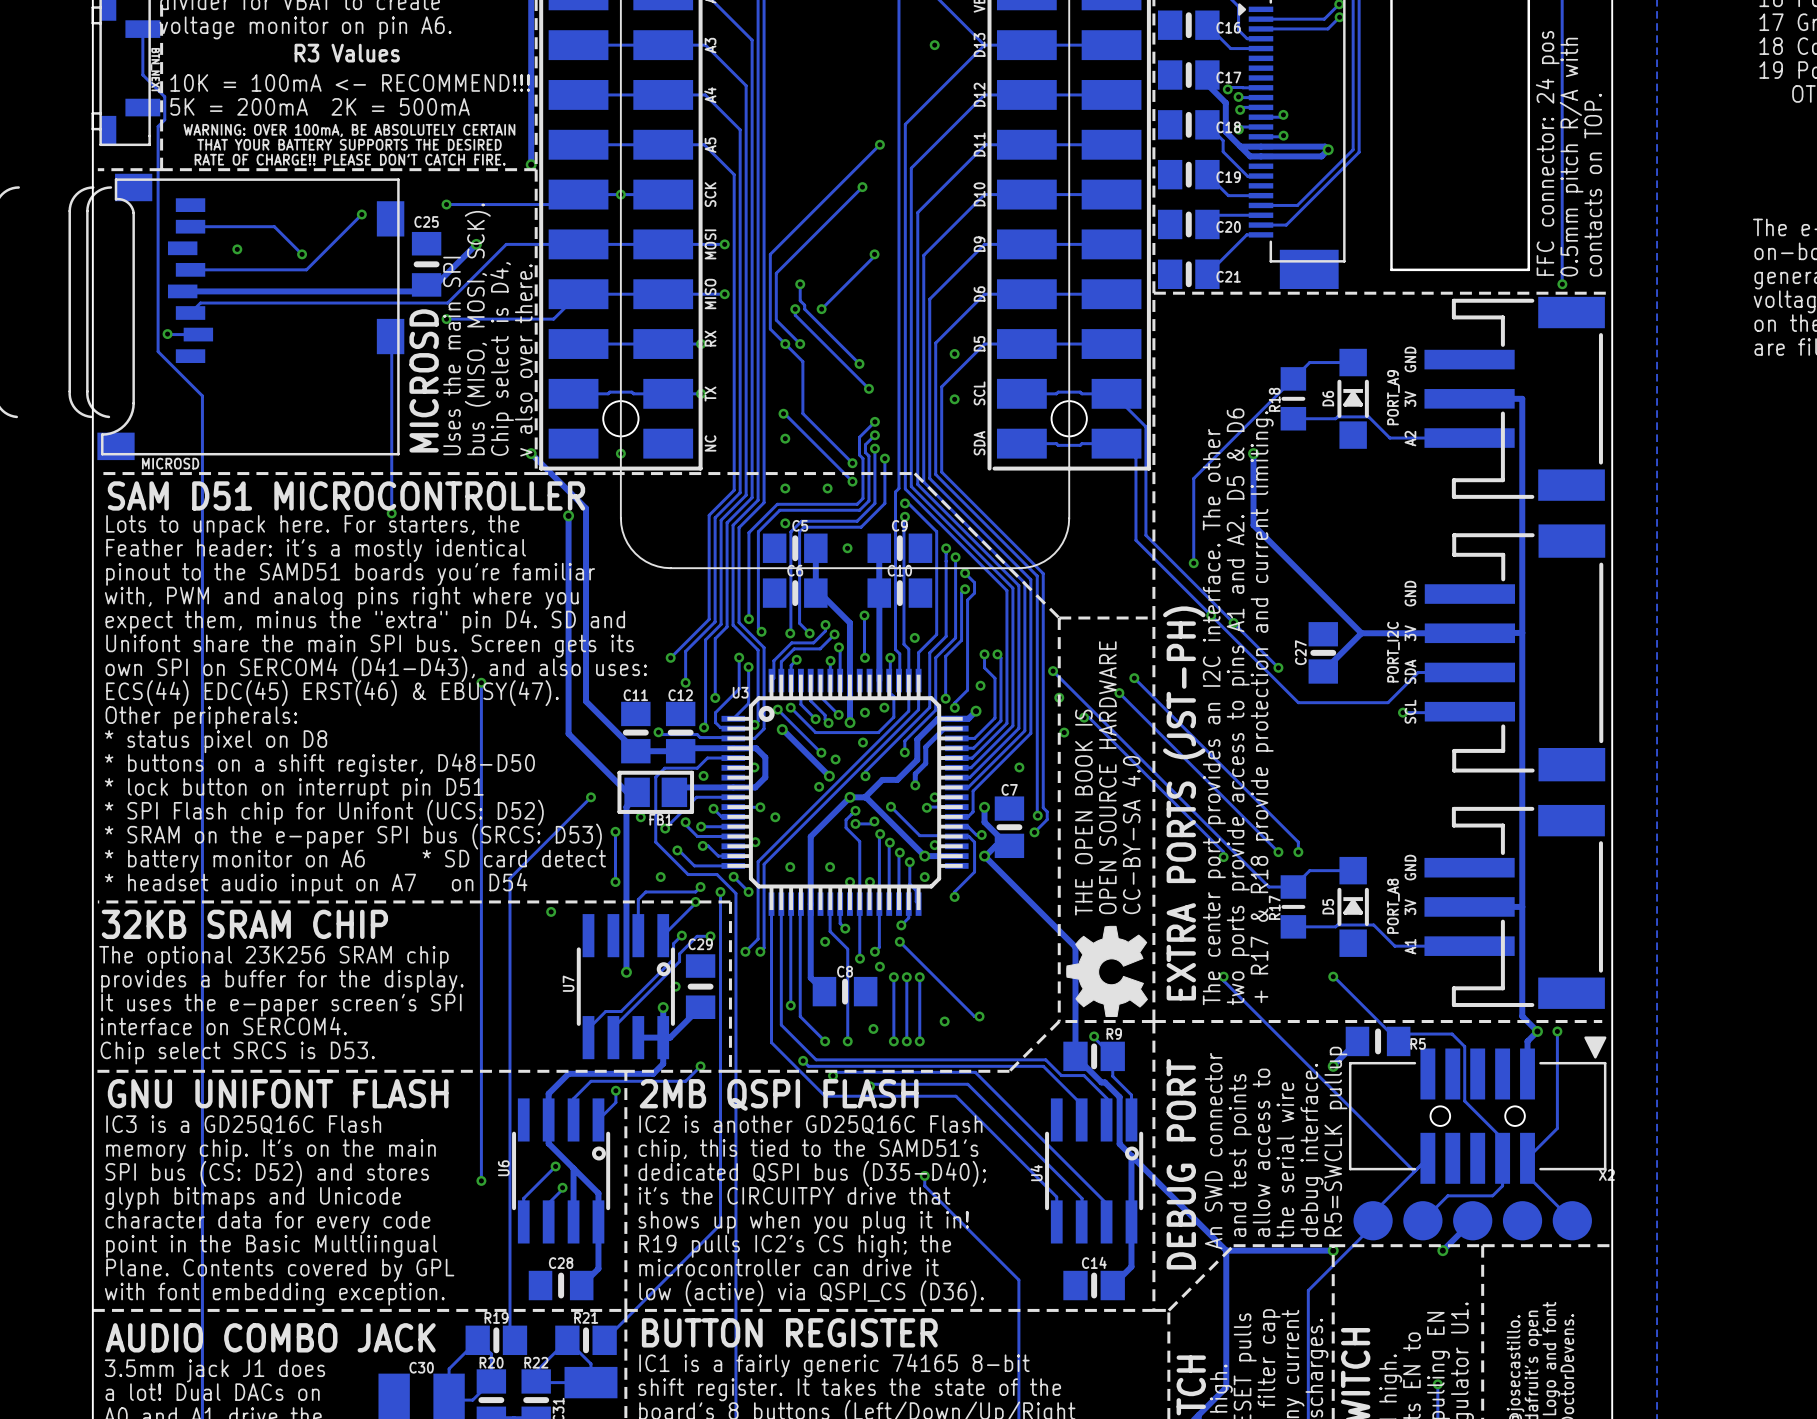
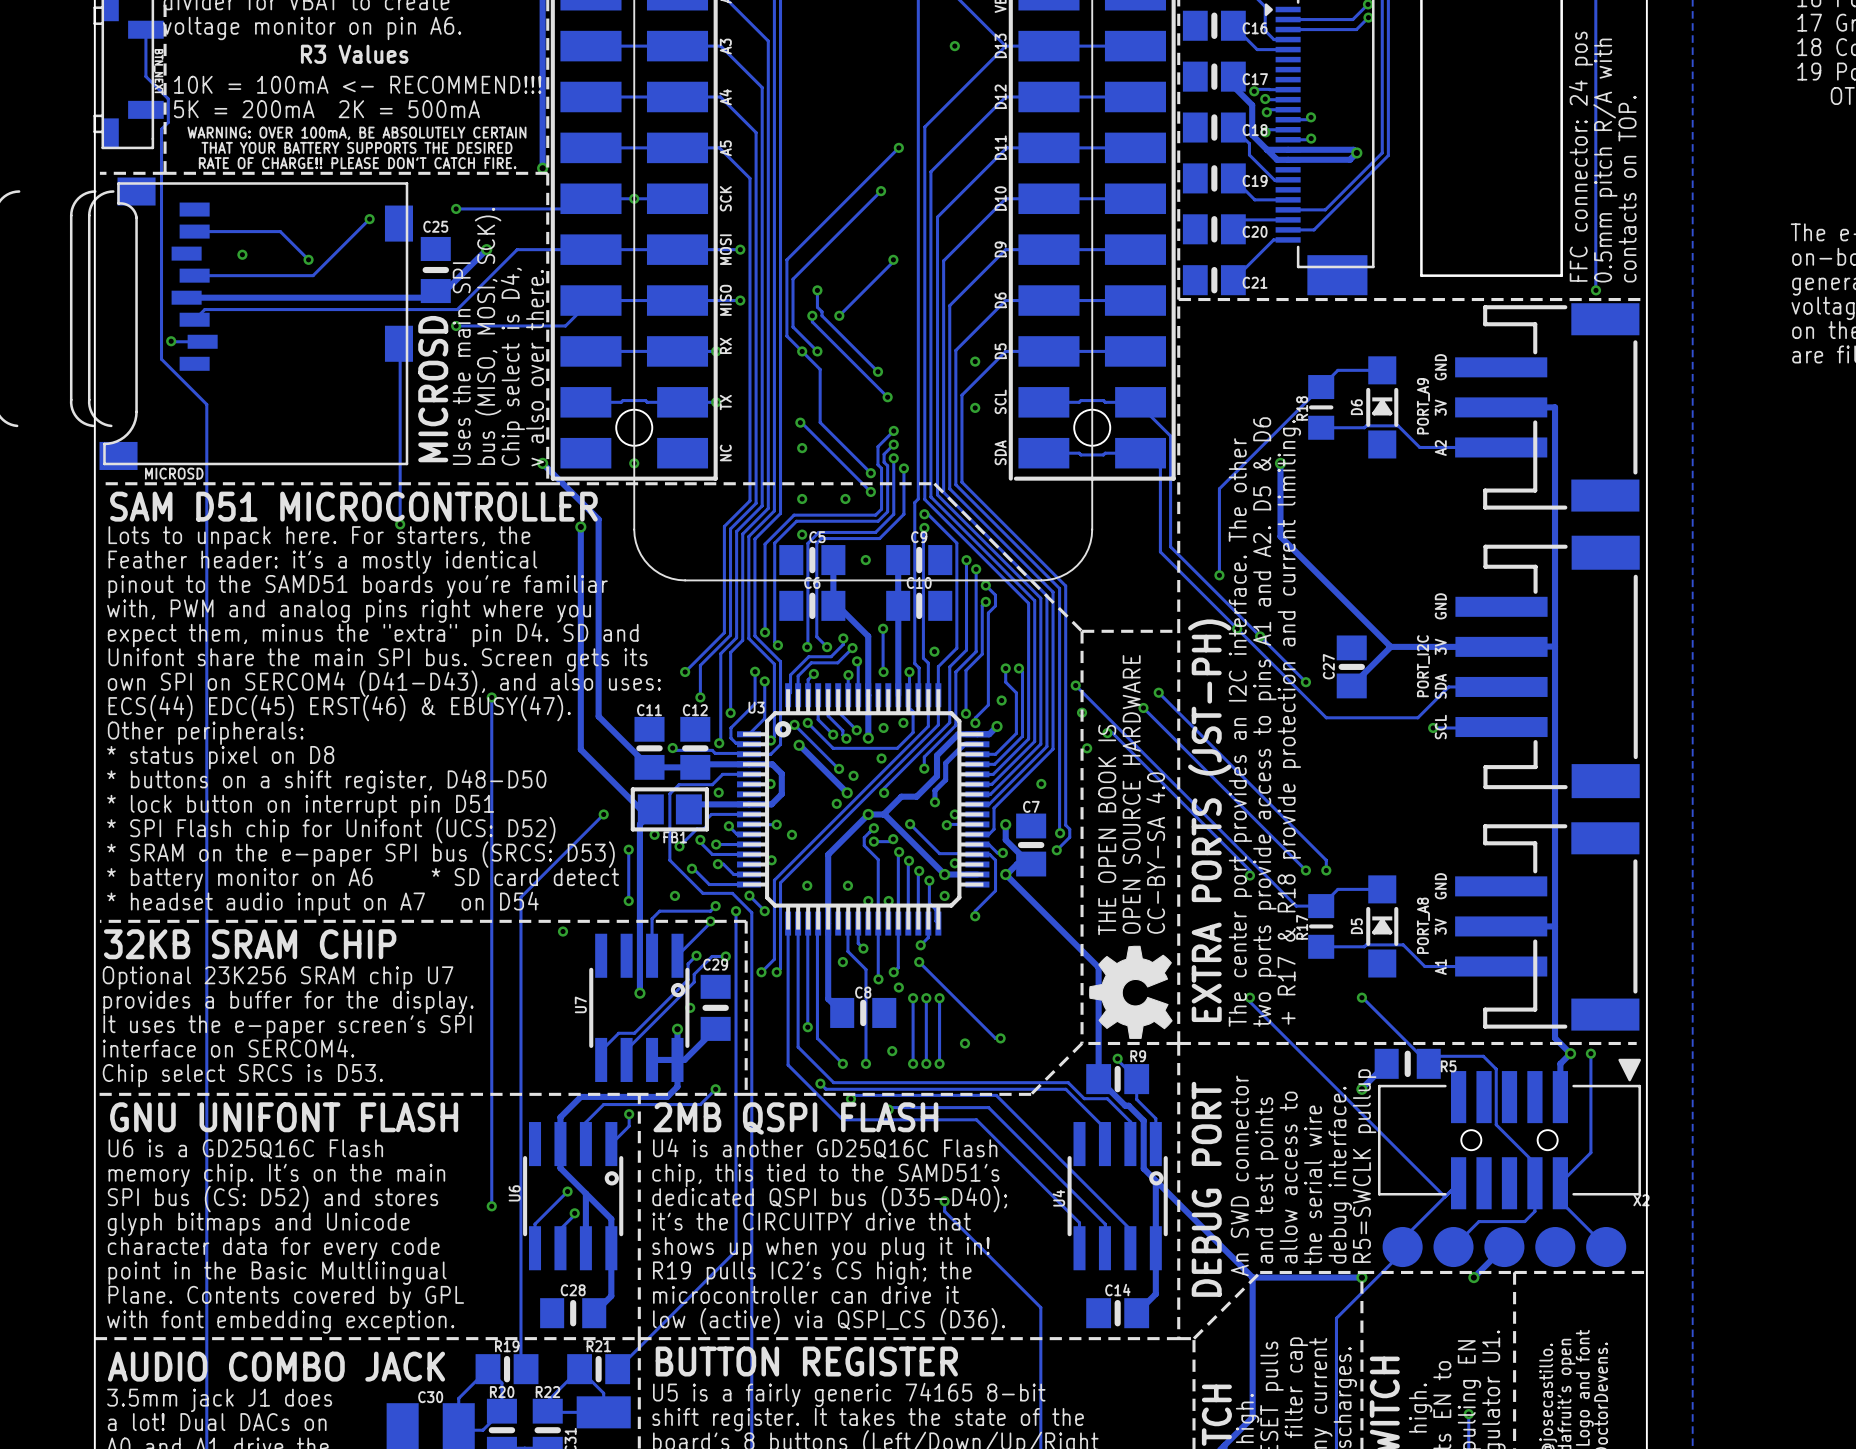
text: The optional 23K256 SRAM chip (273, 957) -> Optional 23K256 SRAM chip U7 (278, 978)
text: IC3 is a GD25Q16C Flash (243, 1124) -> U6 is a GD25Q16C Flash (245, 1149)
text: IC2 is another GD25Q16C Flash (810, 1124) -> U4 is another GD25Q16C Flash (825, 1148)
text: IC1 is a fairly generic 74165 8-bit (834, 1365) -> U5 is a fairly generic 74165 8-bit (849, 1394)

